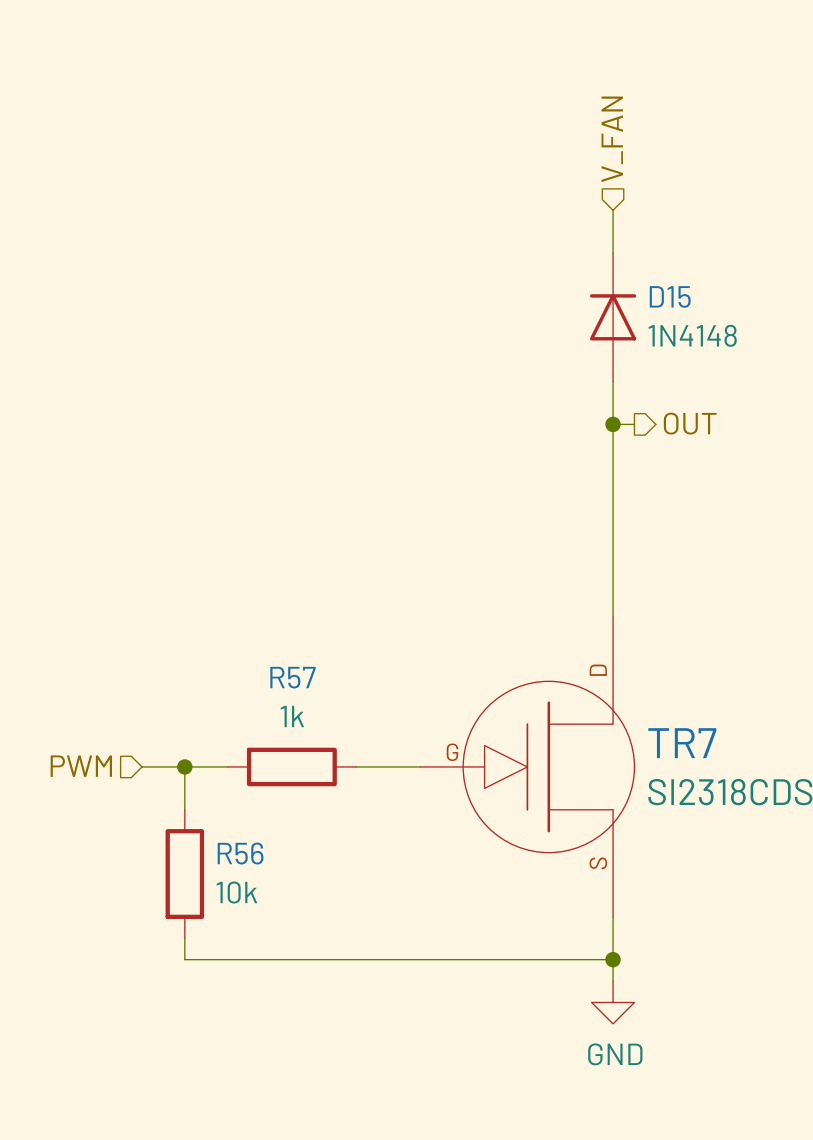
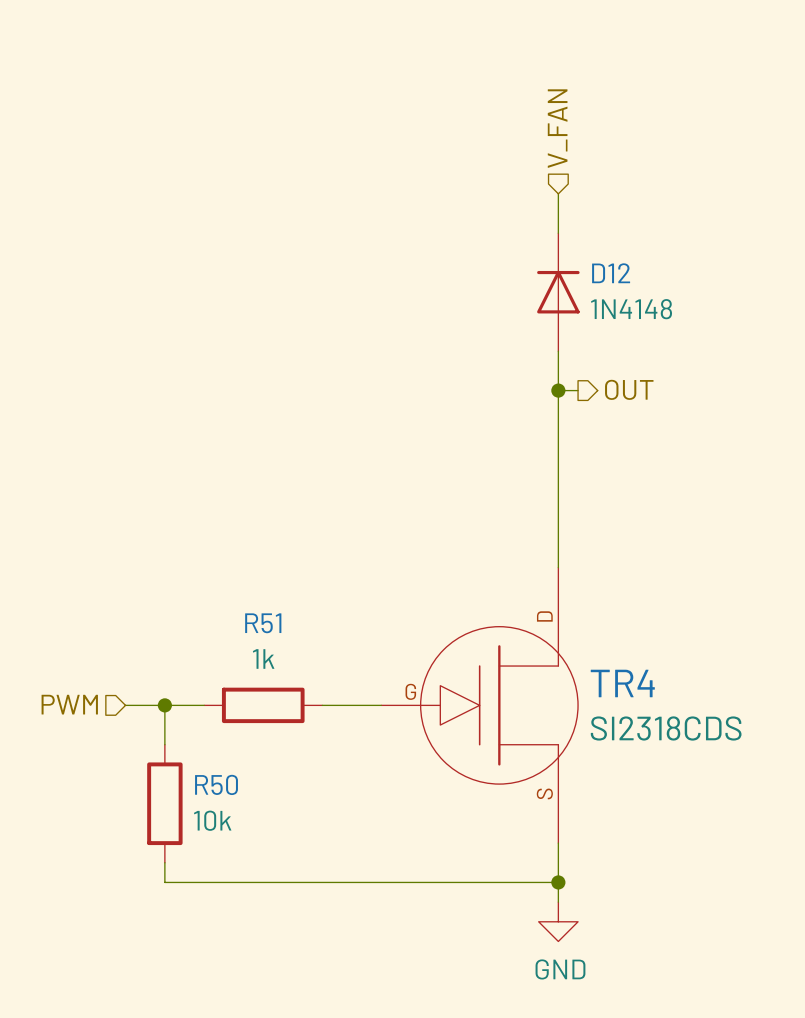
D15 name: D15 (670, 296) -> D12 (611, 273)
R57 name: R57 (292, 677) -> R51 (263, 623)
TR7 name: TR7 (682, 743) -> TR4 (622, 683)
R56 name: R56 (240, 853) -> R50 (216, 784)

